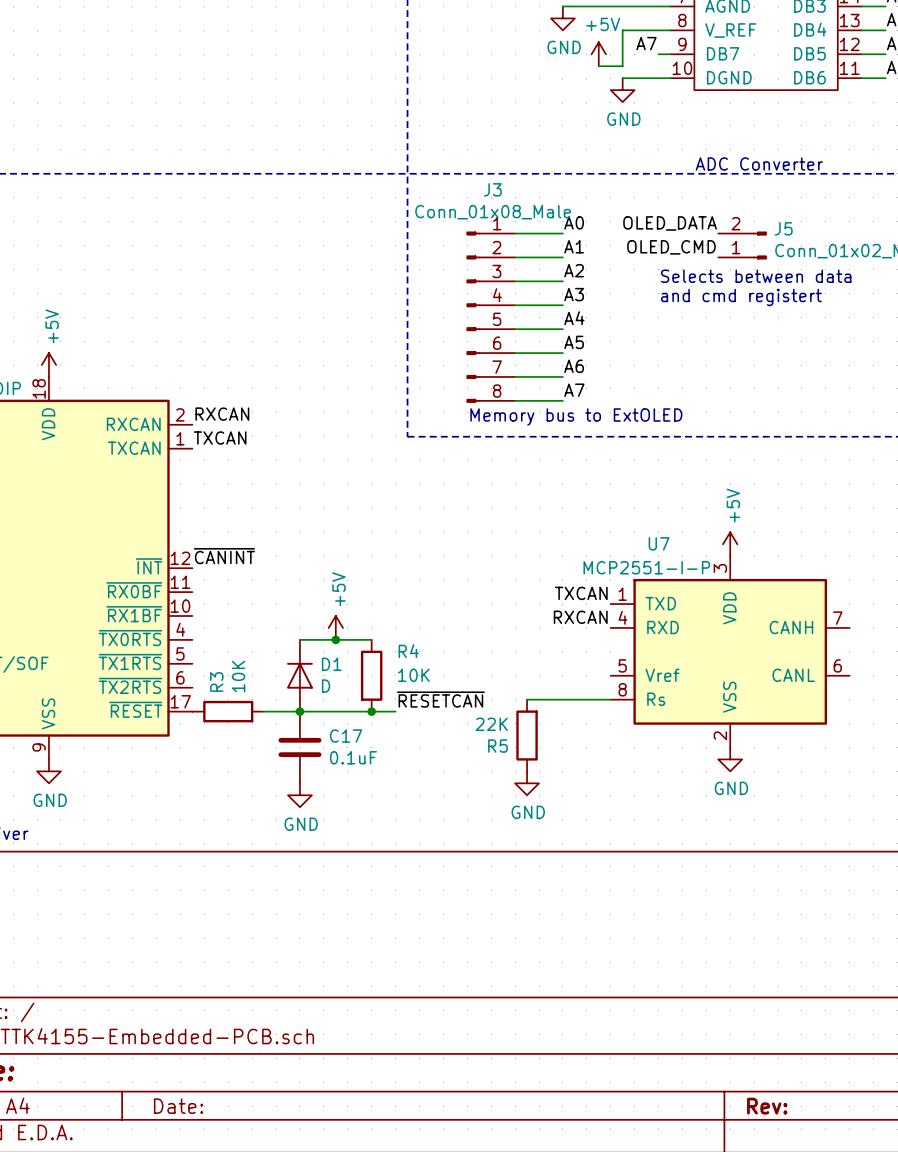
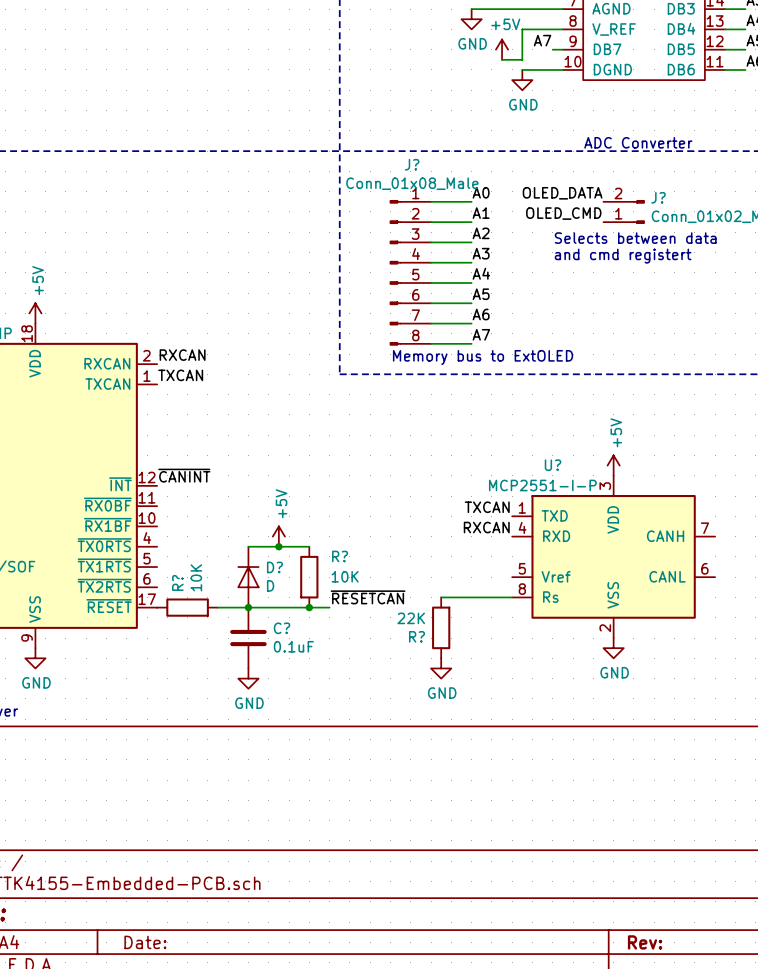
J3 name: J3 (492, 189) -> J? (412, 164)
J5 name: J5 (783, 228) -> J? (658, 197)
U7 name: U7 (659, 543) -> U? (553, 465)
R4 name: R4 (408, 651) -> R? (340, 556)
D1 name: D1 (331, 664) -> D? (274, 567)
R3 name: R3 (216, 681) -> R? (177, 582)
C17 name: C17 (346, 736) -> C? (282, 628)
R5 name: R5 (497, 746) -> R? (417, 636)

